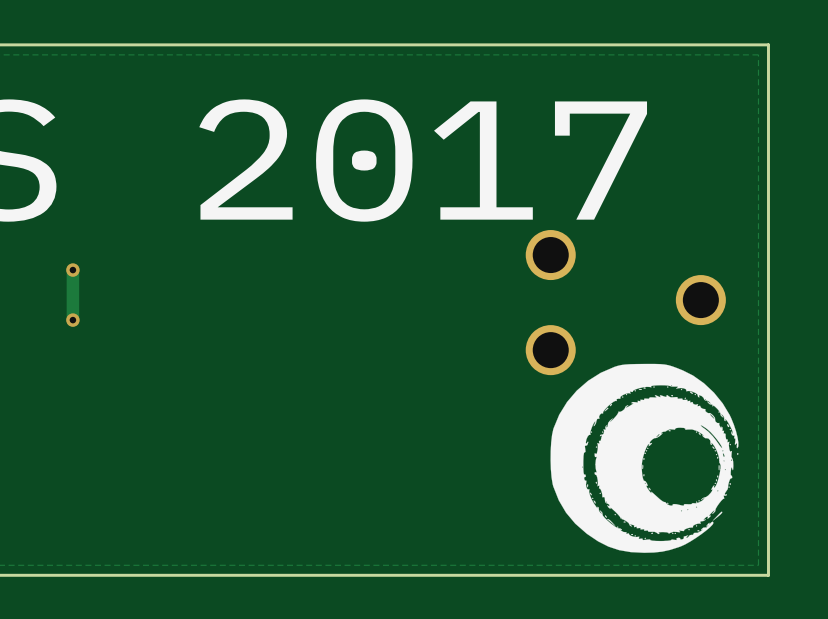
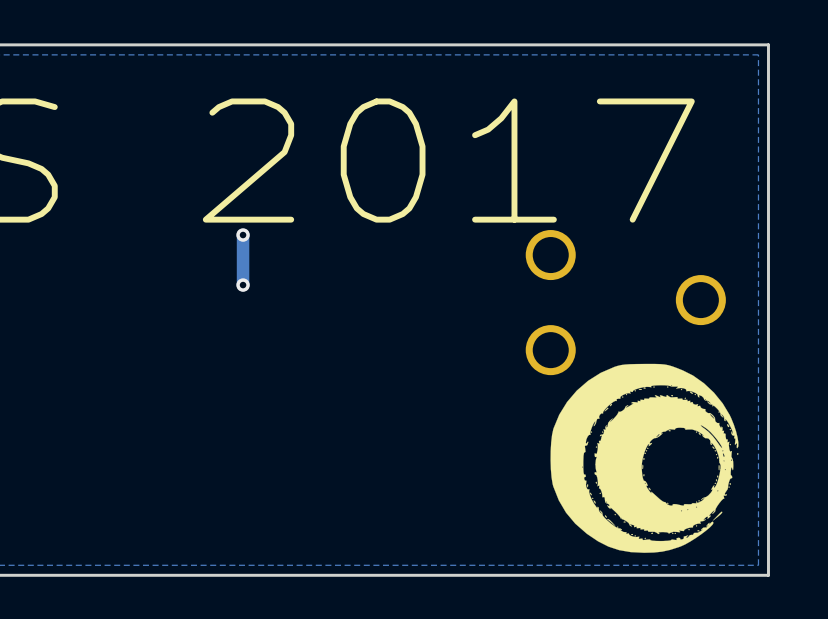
via: none -> (243, 235)
track: (72, 270) (72, 320) -> (243, 235) (243, 285)
via: (72, 270) -> none
via: none -> (243, 285)
via: (72, 320) -> none

